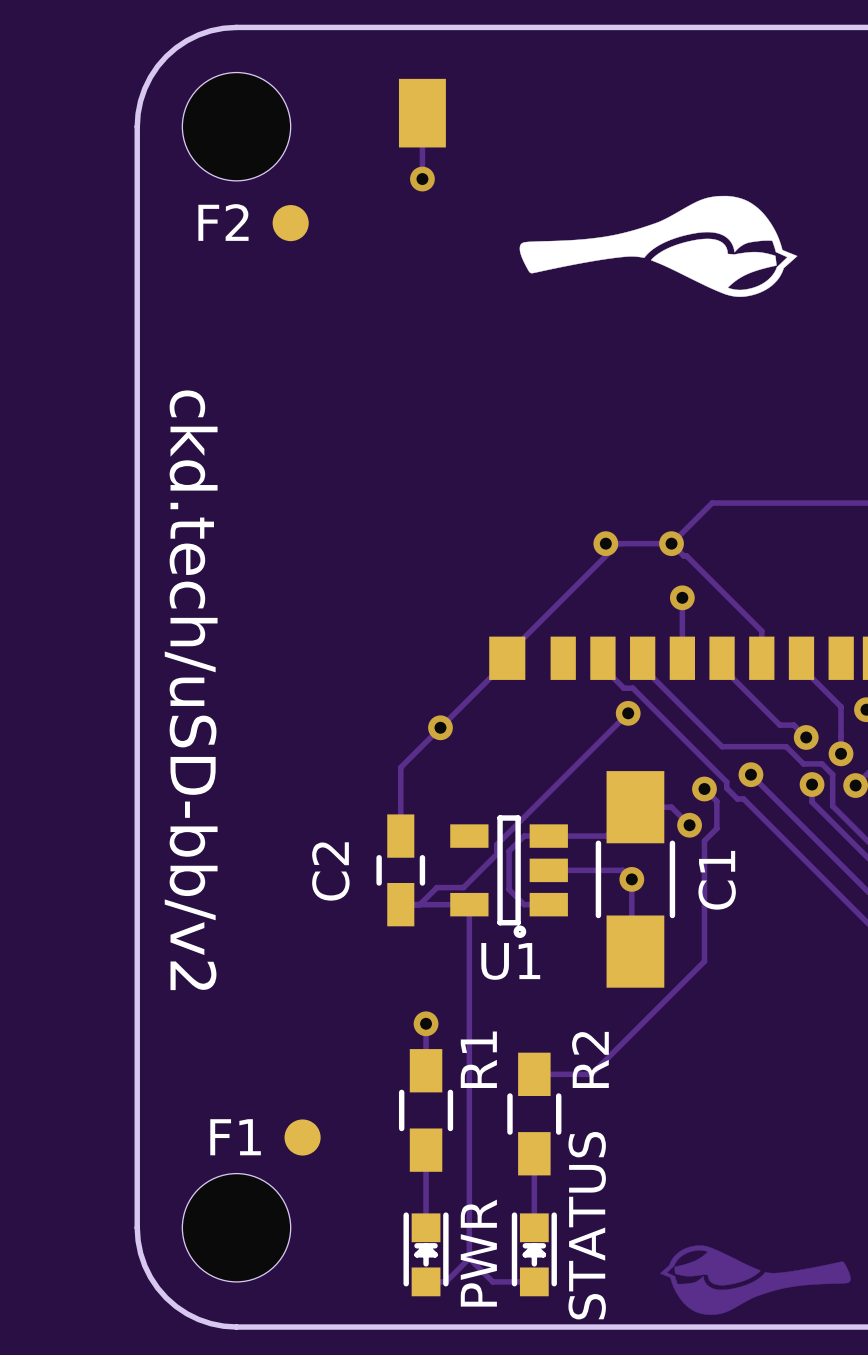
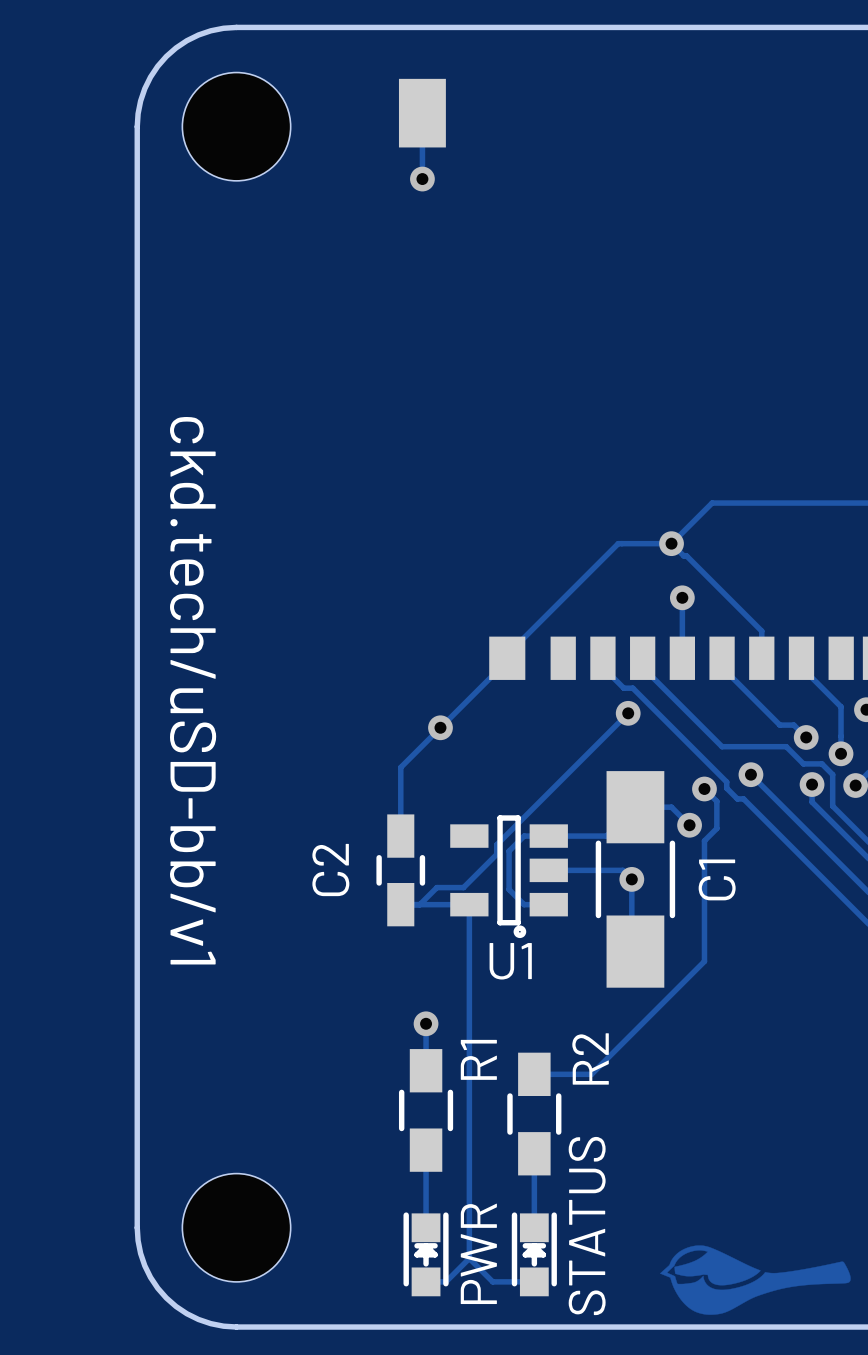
drawing: [519, 195, 798, 297] -> none
F2: (290, 223) -> none
via: (605, 543) -> none
text: ckd.tech/uSD-bb/v2 (191, 690) -> ckd.tech/uSD-bb/v1 (193, 690)
F1: (302, 1137) -> none

